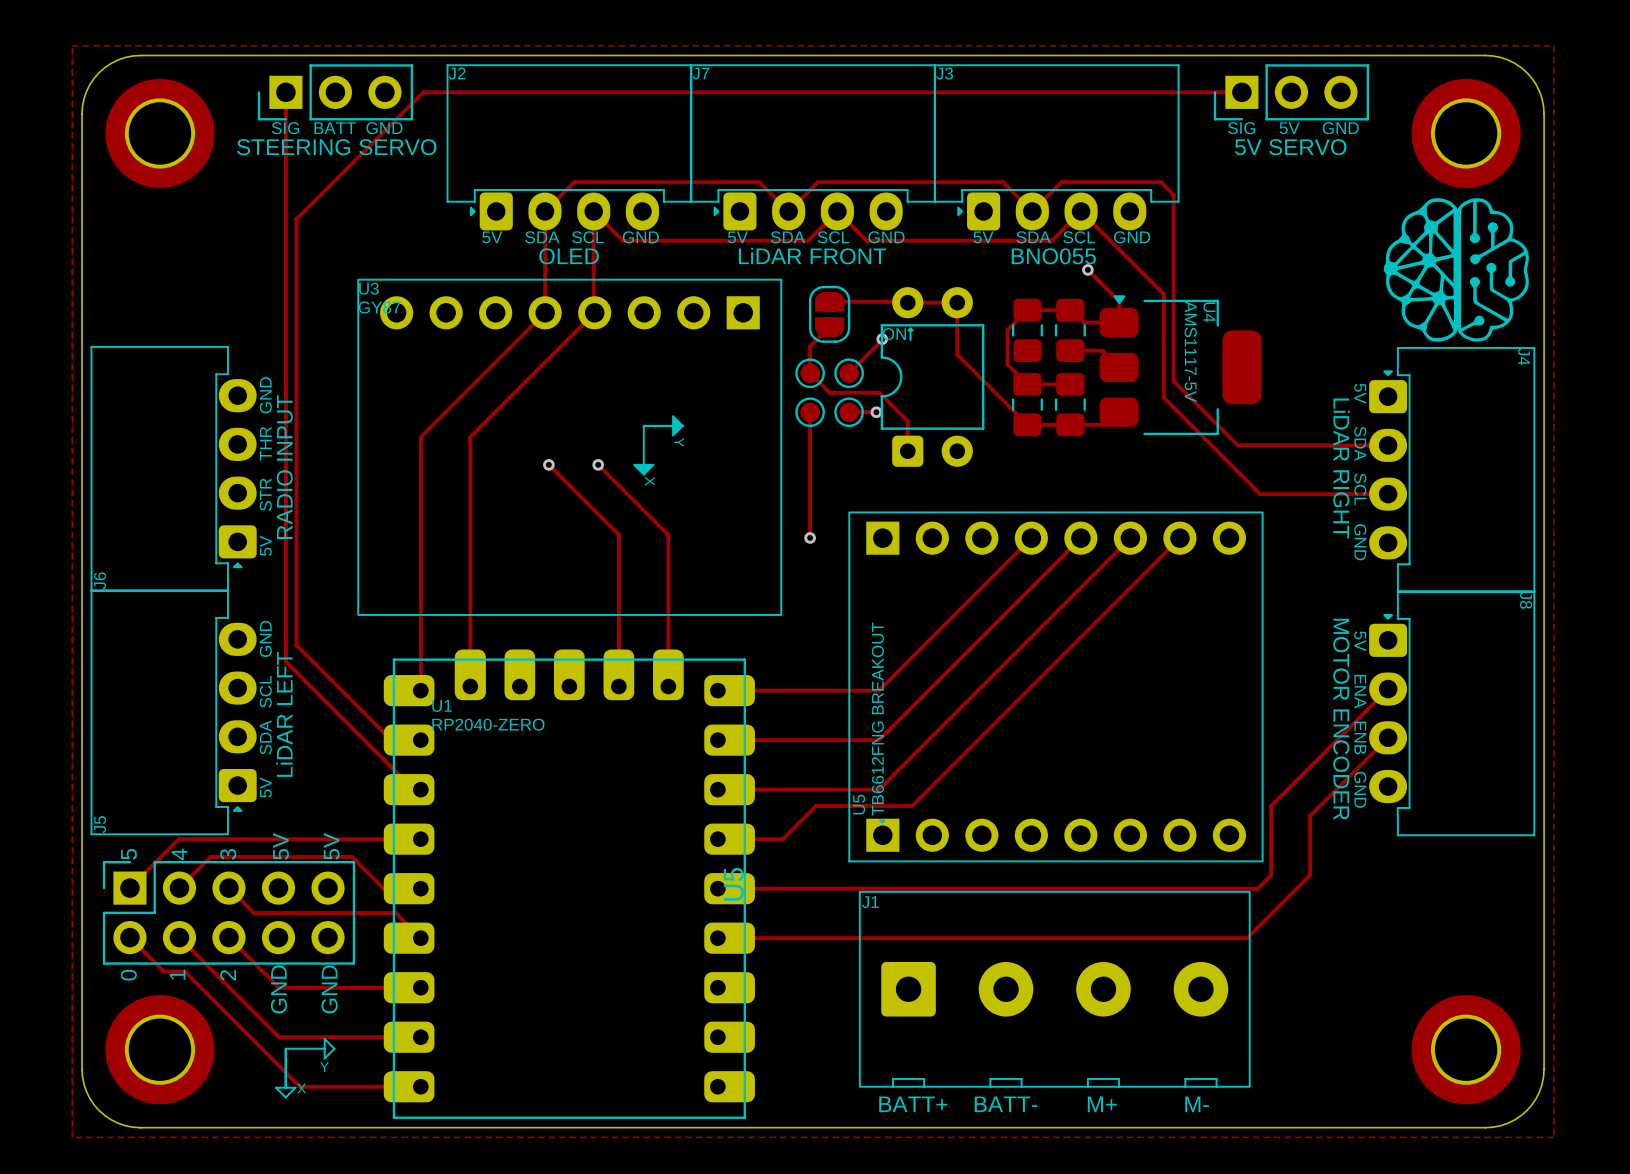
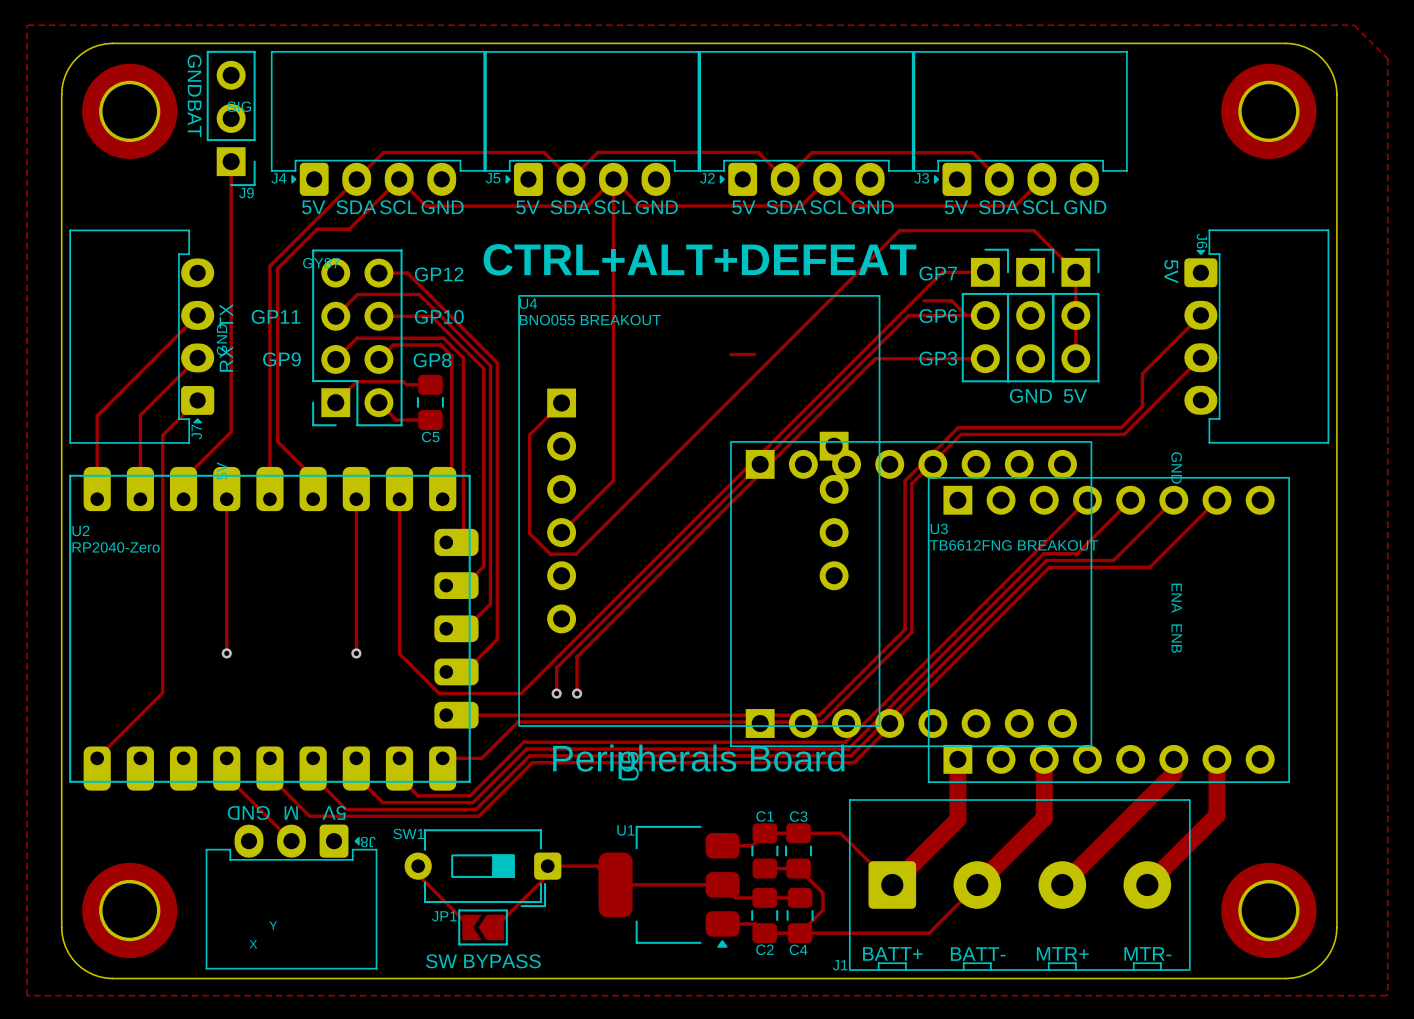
zone outline: (72, 45) (1553, 45) (1553, 1137) (72, 1137) (72, 45) -> (27, 25) (27, 995) (1386, 995) (1387, 994) (1387, 58) (1354, 25) (27, 25)
text position: J2 (457, 73) -> J2 (707, 178)
text: J7 (700, 73) -> none
text position: J3 (944, 73) -> J3 (921, 178)
text: none -> GND (194, 75)
track: (285, 92) (285, 661) (413, 789) (420, 789) -> none
part rotation: 0° (335, 92) -> 90° counterclockwise (231, 118)
track: (1241, 92) (423, 92) (296, 219) (296, 645) (391, 740) (420, 740) -> none
part: (1291, 92) -> none
text: BATT (335, 128) -> none
text: GND (384, 128) -> none
text: SIG (1241, 128) -> none
text: 5V (1289, 128) -> none
text: GND (1340, 128) -> none
text: STEERING SERVO (336, 147) -> BAT (194, 118)
part: none -> (377, 123)
part: (569, 147) -> none
part: none -> (592, 123)
part: (813, 147) -> none
part: none -> (806, 123)
part: (1056, 147) -> none
part: none -> (1020, 123)
text: 5V SERVO (1290, 147) -> none
track: none -> (231, 161) (231, 431) (183, 479) (183, 499)
drawing: [1383, 198, 1529, 342] -> none
text: none -> J4 (278, 178)
text: none -> J5 (493, 178)
track: none -> (613, 179) (639, 205) (801, 205) (827, 179) (854, 205) (1015, 205) (1041, 179)
track: none -> (613, 179) (613, 480) (561, 532)
track: none -> (613, 179) (586, 206) (426, 206) (399, 179) (349, 229) (317, 229) (277, 268) (277, 441) (313, 477) (313, 499)
track: none -> (999, 179) (972, 152) (811, 152) (785, 179) (758, 152) (597, 152) (570, 179) (544, 152) (383, 152) (269, 266) (269, 499)
track: (544, 226) (544, 211) (574, 182) (759, 182) (788, 211) (817, 182) (1003, 182) (1032, 211) (1061, 182) (1161, 182) (1173, 194) (1173, 381) (1238, 445) (1388, 445) -> none
track: (545, 226) (545, 312) (420, 437) (420, 690) -> none
text: none -> J9 (246, 192)
text: 5V (492, 237) -> SCL (398, 207)
text: SDA (542, 237) -> GND (442, 207)
text: SCL (587, 237) -> none
text: GND (640, 237) -> 5V (527, 207)
text: 5V (737, 237) -> SCL (612, 207)
text: SDA (787, 237) -> GND (656, 207)
text: SCL (833, 237) -> none
text: GND (886, 237) -> 5V (743, 207)
text: 5V (983, 237) -> SCL (828, 207)
text: SDA (1033, 237) -> GND (872, 207)
text: SCL (1079, 237) -> none
text: GND (1132, 237) -> 5V (956, 207)
text: none -> 5V (313, 207)
text: none -> SDA (356, 207)
text: none -> SDA (570, 207)
text: none -> SDA (786, 207)
text: none -> SDA (998, 207)
text: none -> SCL (1041, 207)
text: none -> GND (1085, 207)
text: OLED (569, 256) -> none
text: LiDAR FRONT (812, 256) -> none
text: BNO055 (1053, 256) -> none
track: (1087, 269) (1119, 301) (1119, 322) (1084, 322) (1071, 310) (1027, 310) (1007, 330) (1007, 364) (1027, 384) (1070, 384) -> none
via: (1087, 269) -> none
text: none -> J6 (1201, 241)
text: U3 (368, 288) -> none
part footprint: [1099, 295, 1262, 436] -> [1006, 248, 1055, 383]
track: (829, 301) (957, 302) (957, 354) (1027, 424) (1106, 424) (1119, 412) -> none
text: none -> CTRL+ALT+DEFEAT (699, 259)
text: U4 (1209, 312) -> none
part: (829, 314) -> none
track: none -> (942, 272) (521, 693) (439, 693) (399, 653) (399, 499)
track: none -> (942, 272) (985, 272)
text: none -> 5V (1171, 271)
track: none -> (378, 273) (407, 273) (497, 362) (497, 639) (464, 671) (446, 671)
text: none -> GP7 (938, 273)
text: none -> GP12 (439, 274)
track: (829, 327) (810, 346) (810, 373) (829, 392) (879, 392) (907, 421) (907, 451) -> none
line: (910, 328) (912, 330) (908, 330) (910, 328) -> none
line: (910, 330) (910, 340) -> none
part: (1027, 330) -> none
part: (1070, 330) -> none
text: ON (894, 334) -> none
via: (882, 339) -> none
track: (882, 340) (849, 373) -> none
text: AMS1117-5V (1190, 351) -> none
text: none -> U4 (528, 303)
text: J4 (1523, 356) -> none
track: none -> (197, 315) (97, 415) (97, 499)
track: none -> (985, 315) (908, 315) (556, 667) (556, 693)
part: none -> (985, 315)
part: none -> (1075, 315)
track: none -> (1200, 315) (1142, 373) (1142, 406) (1121, 427) (958, 427) (905, 480) (905, 629) (819, 715) (446, 715)
text: none -> TX (226, 316)
track: none -> (335, 316) (357, 294) (419, 294) (490, 365) (490, 603) (465, 628) (446, 628)
track: none -> (378, 316) (431, 316) (483, 368) (483, 566) (464, 585) (446, 585)
text: none -> GP6 (938, 316)
text: none -> GP11 (275, 316)
text: none -> GP10 (439, 316)
text: none -> BNO055 BREAKOUT (590, 320)
part: (810, 373) -> none
part: (849, 373) -> none
part: (932, 376) -> none
part: none -> (357, 337)
text: 5V (1360, 393) -> none
part: (1027, 404) -> none
part: (1070, 404) -> none
track: (810, 412) (810, 537) -> none
part: (810, 412) -> none
part: (849, 412) -> none
via: (876, 412) -> none
track: none -> (1200, 357) (1124, 434) (961, 434) (911, 483) (911, 632) (822, 721) (518, 721) (481, 758) (442, 758)
track: none -> (197, 357) (140, 415) (140, 499)
text: none -> GP3 (938, 358)
text: none -> RX (226, 359)
text: none -> GP9 (281, 359)
track: none -> (335, 359) (357, 338) (443, 338) (463, 357) (463, 542) (446, 542)
track: none -> (378, 359) (393, 345) (440, 345) (451, 355) (451, 490) (442, 499)
track: none -> (985, 358) (875, 358) (577, 656) (577, 693)
track: none -> (1075, 358) (1075, 272) (1034, 230) (899, 230) (576, 554) (550, 554) (529, 533) (529, 434) (561, 402)
text: none -> GP8 (432, 360)
text: THR (265, 443) -> none
text: SDA (1360, 443) -> none
track: none -> (430, 384) (406, 384) (403, 381) (356, 381) (335, 402)
part: (569, 447) -> none
text: none -> GND (1030, 395)
text: none -> 5V (1075, 396)
track: none -> (197, 400) (162, 435) (162, 692) (97, 758)
track: (548, 464) (618, 534) (618, 686) -> none
via: (548, 464) -> none
track: (598, 464) (668, 535) (668, 686) -> none
via: (598, 464) -> none
text: RADIO INPUT (284, 467) -> none
track: none -> (378, 402) (396, 420) (430, 420)
part: none -> (430, 402)
part position: (173, 468) -> (141, 336)
text: LiDAR RIGHT (1341, 468) -> none
part position: (1452, 469) -> (1256, 336)
text: SCL (1360, 489) -> none
text: STR (265, 494) -> none
track: (1388, 494) (1260, 494) (1163, 397) (1163, 294) (1081, 211) (1051, 240) (866, 240) (837, 211) (808, 240) (622, 240) (593, 211) (594, 312) (470, 437) (470, 686) -> none
text: none -> J7 (196, 431)
text: none -> C5 (430, 436)
via: (810, 537) -> none
track: (1031, 538) (878, 690) (717, 690) -> none
track: (1080, 538) (878, 740) (717, 740) -> none
track: (1130, 538) (878, 789) (717, 789) -> none
track: (1179, 538) (912, 806) (815, 806) (782, 839) (717, 839) -> none
track: none -> (226, 499) (226, 653)
track: none -> (356, 499) (356, 653)
track: none -> (1087, 500) (845, 742) (523, 742) (470, 795) (417, 795) (399, 777) (399, 758)
track: none -> (1130, 500) (1077, 553) (1043, 553) (848, 749) (526, 749) (472, 802) (382, 802) (356, 776) (356, 758)
track: none -> (1173, 500) (1113, 560) (1046, 560) (851, 755) (529, 755) (476, 809) (346, 809) (313, 776) (313, 758)
track: none -> (1217, 500) (1149, 567) (1049, 567) (853, 762) (532, 762) (478, 816) (309, 816) (269, 776) (269, 758)
text: J6 (100, 580) -> none
part: none -> (699, 510)
text: J8 (1526, 600) -> none
text: none -> U3 (939, 528)
text: none -> U2 (80, 530)
text: none -> RP2040-Zero (116, 547)
text: GND (265, 638) -> none
text: 5V (1360, 641) -> none
track: (1388, 689) (1271, 806) (1271, 875) (1257, 888) (717, 888) -> none
text: SCL (265, 691) -> none
text position: U1 (442, 705) -> U1 (625, 830)
part: (173, 712) -> none
part: (1452, 713) -> none
text: LiDAR LEFT (284, 714) -> none
text rotation: 0° (877, 718) -> 90° clockwise (1013, 545)
text position: TB6612FNG BREAKOUT (877, 718) -> TB6612FNG BREAKOUT (1013, 545)
text: MOTOR ENCODER (1341, 719) -> none
text: RP2040-ZERO (488, 724) -> none
part: none -> (1108, 629)
text: SDA (265, 737) -> none
track: (1388, 737) (1310, 815) (1310, 875) (1247, 938) (717, 938) -> none
via: none -> (226, 653)
via: none -> (356, 653)
text: 5V (265, 787) -> none
text: GND (1360, 789) -> none
via: none -> (556, 693)
via: none -> (577, 693)
text: U5 (859, 804) -> none
line: (880, 820) (884, 820) (882, 822) (880, 820) -> none
text: J5 (100, 824) -> none
track: (420, 839) (178, 839) (129, 888) -> none
text: 5V (280, 846) -> none
text: 5V (331, 846) -> none
text: 5 (128, 854) -> none
text: 4 (179, 854) -> none
text: 3 (228, 854) -> none
track: none -> (226, 758) (226, 776) (291, 841)
track: none -> (957, 759) (957, 819) (892, 885) (840, 833) (764, 833) (752, 845) (722, 845)
track: none -> (1044, 759) (1044, 818) (929, 933) (764, 933) (755, 923) (722, 923)
track: none -> (1173, 759) (1173, 773) (1062, 885)
track: none -> (1217, 759) (1217, 815) (1147, 885)
text: none -> Peripherals Board (698, 761)
part rotation: 0° (569, 884) -> 90° clockwise (273, 628)
part position: (569, 884) -> (273, 628)
track: (179, 888) (210, 856) (351, 856) (383, 888) (420, 888) -> none
track: (228, 888) (253, 913) (395, 913) (420, 938) -> none
text position: J1 (870, 902) -> J1 (840, 965)
part: (228, 912) -> none
track: (133, 937) (129, 937) (163, 971) (184, 971) (299, 1086) (420, 1086) -> none
track: (179, 937) (279, 1037) (420, 1037) -> none
track: (228, 937) (279, 987) (420, 987) -> none
text: none -> GND (248, 812)
text: none -> M (291, 812)
text: none -> 5V (334, 812)
text: none -> C1 (765, 816)
text: none -> C3 (798, 816)
text: none -> SW1 (408, 833)
text: none -> J8 (368, 842)
text: 1 (177, 974) -> none
text: 0 (128, 975) -> none
text: 2 (228, 975) -> none
part: none -> (764, 850)
part: none -> (798, 850)
text: GND (278, 989) -> none
text: GND (329, 989) -> none
part position: (1054, 989) -> (1019, 885)
track: none -> (418, 866) (418, 874) (470, 927)
part: none -> (482, 868)
track: none -> (764, 868) (798, 868) (822, 892) (822, 910) (800, 933)
part: none -> (669, 886)
part: none -> (291, 897)
track: none -> (800, 897) (735, 897) (722, 884) (615, 884) (596, 866) (547, 866) (547, 875) (495, 927)
line: (324, 1038) (334, 1048) (324, 1058) (324, 1038) -> none
line: (324, 1048) (285, 1048) (285, 1087) -> none
part: none -> (764, 915)
part: none -> (800, 915)
text: none -> JP1 (444, 916)
part: none -> (483, 927)
line: (275, 1087) (295, 1087) (285, 1097) (275, 1087) -> none
text: none -> C2 (764, 949)
text: none -> C4 (798, 949)
text: none -> MTR+ (1062, 953)
text: none -> MTR- (1147, 953)
text position: BATT+ (913, 1104) -> BATT+ (892, 953)
text position: BATT- (1006, 1104) -> BATT- (978, 954)
text: M+ (1102, 1104) -> none
text: M- (1197, 1104) -> none
text: none -> SW BYPASS (483, 961)

